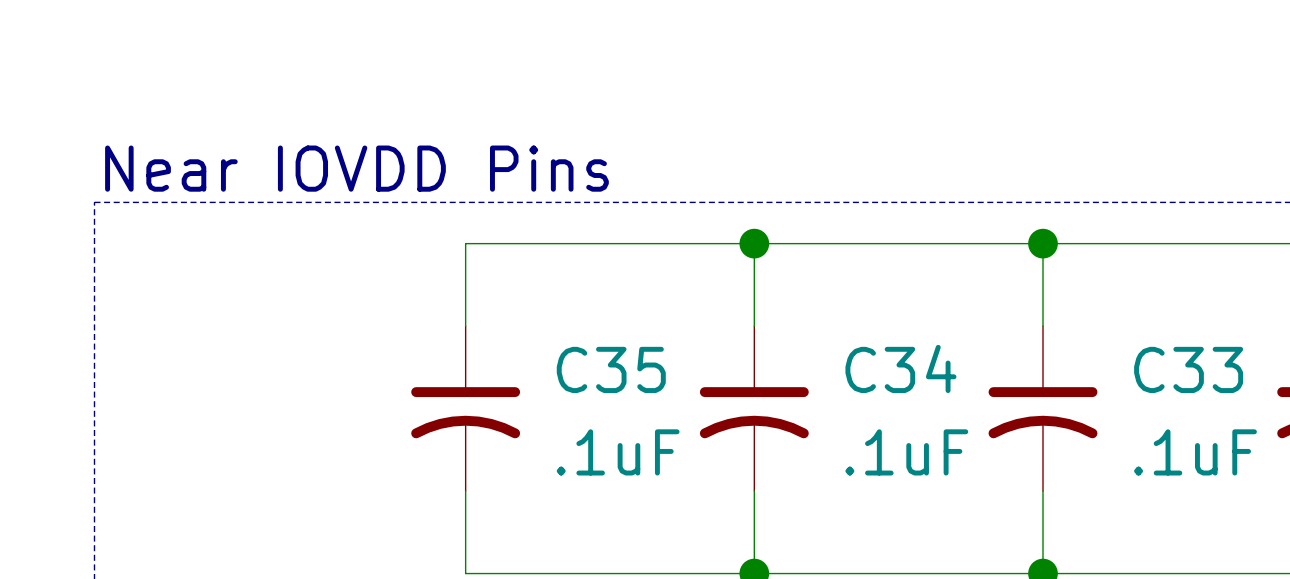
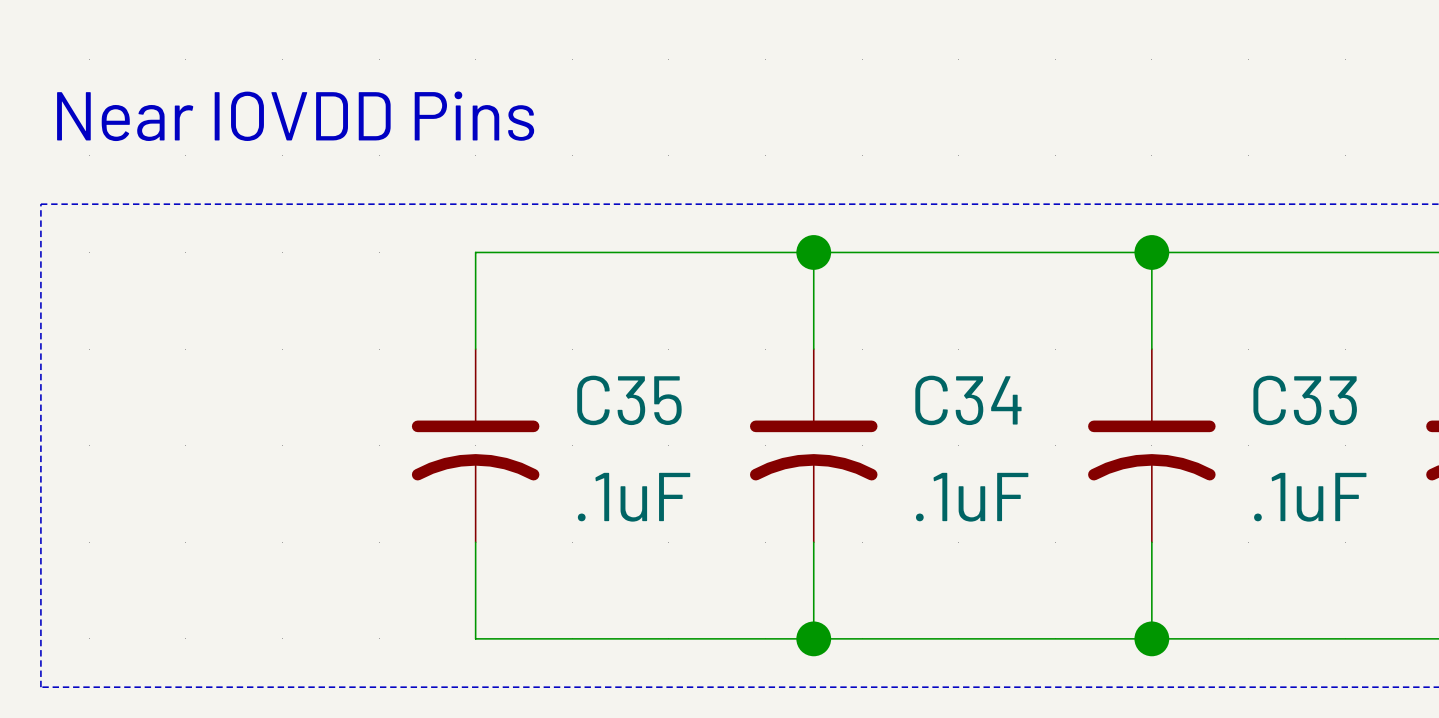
text position: Near IOVDD Pins (356, 168) -> Near IOVDD Pins (295, 116)

